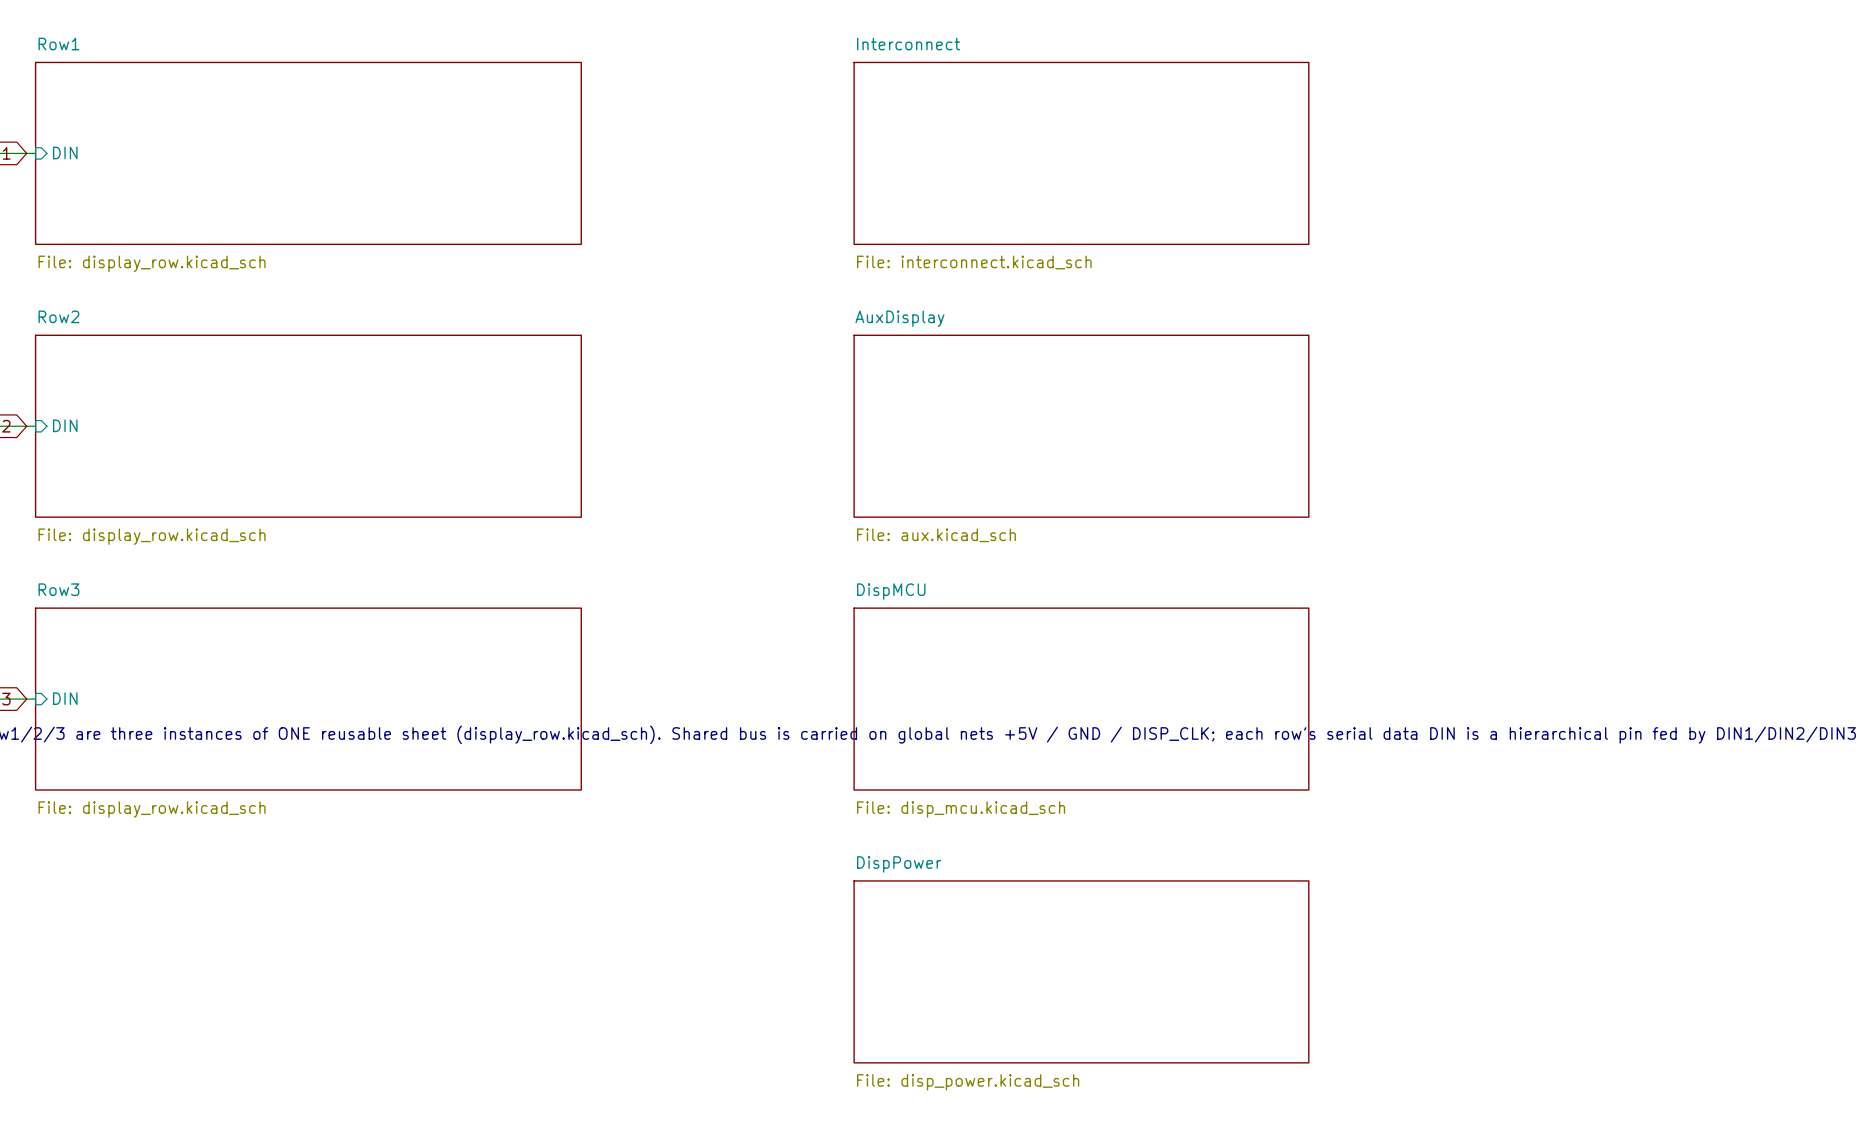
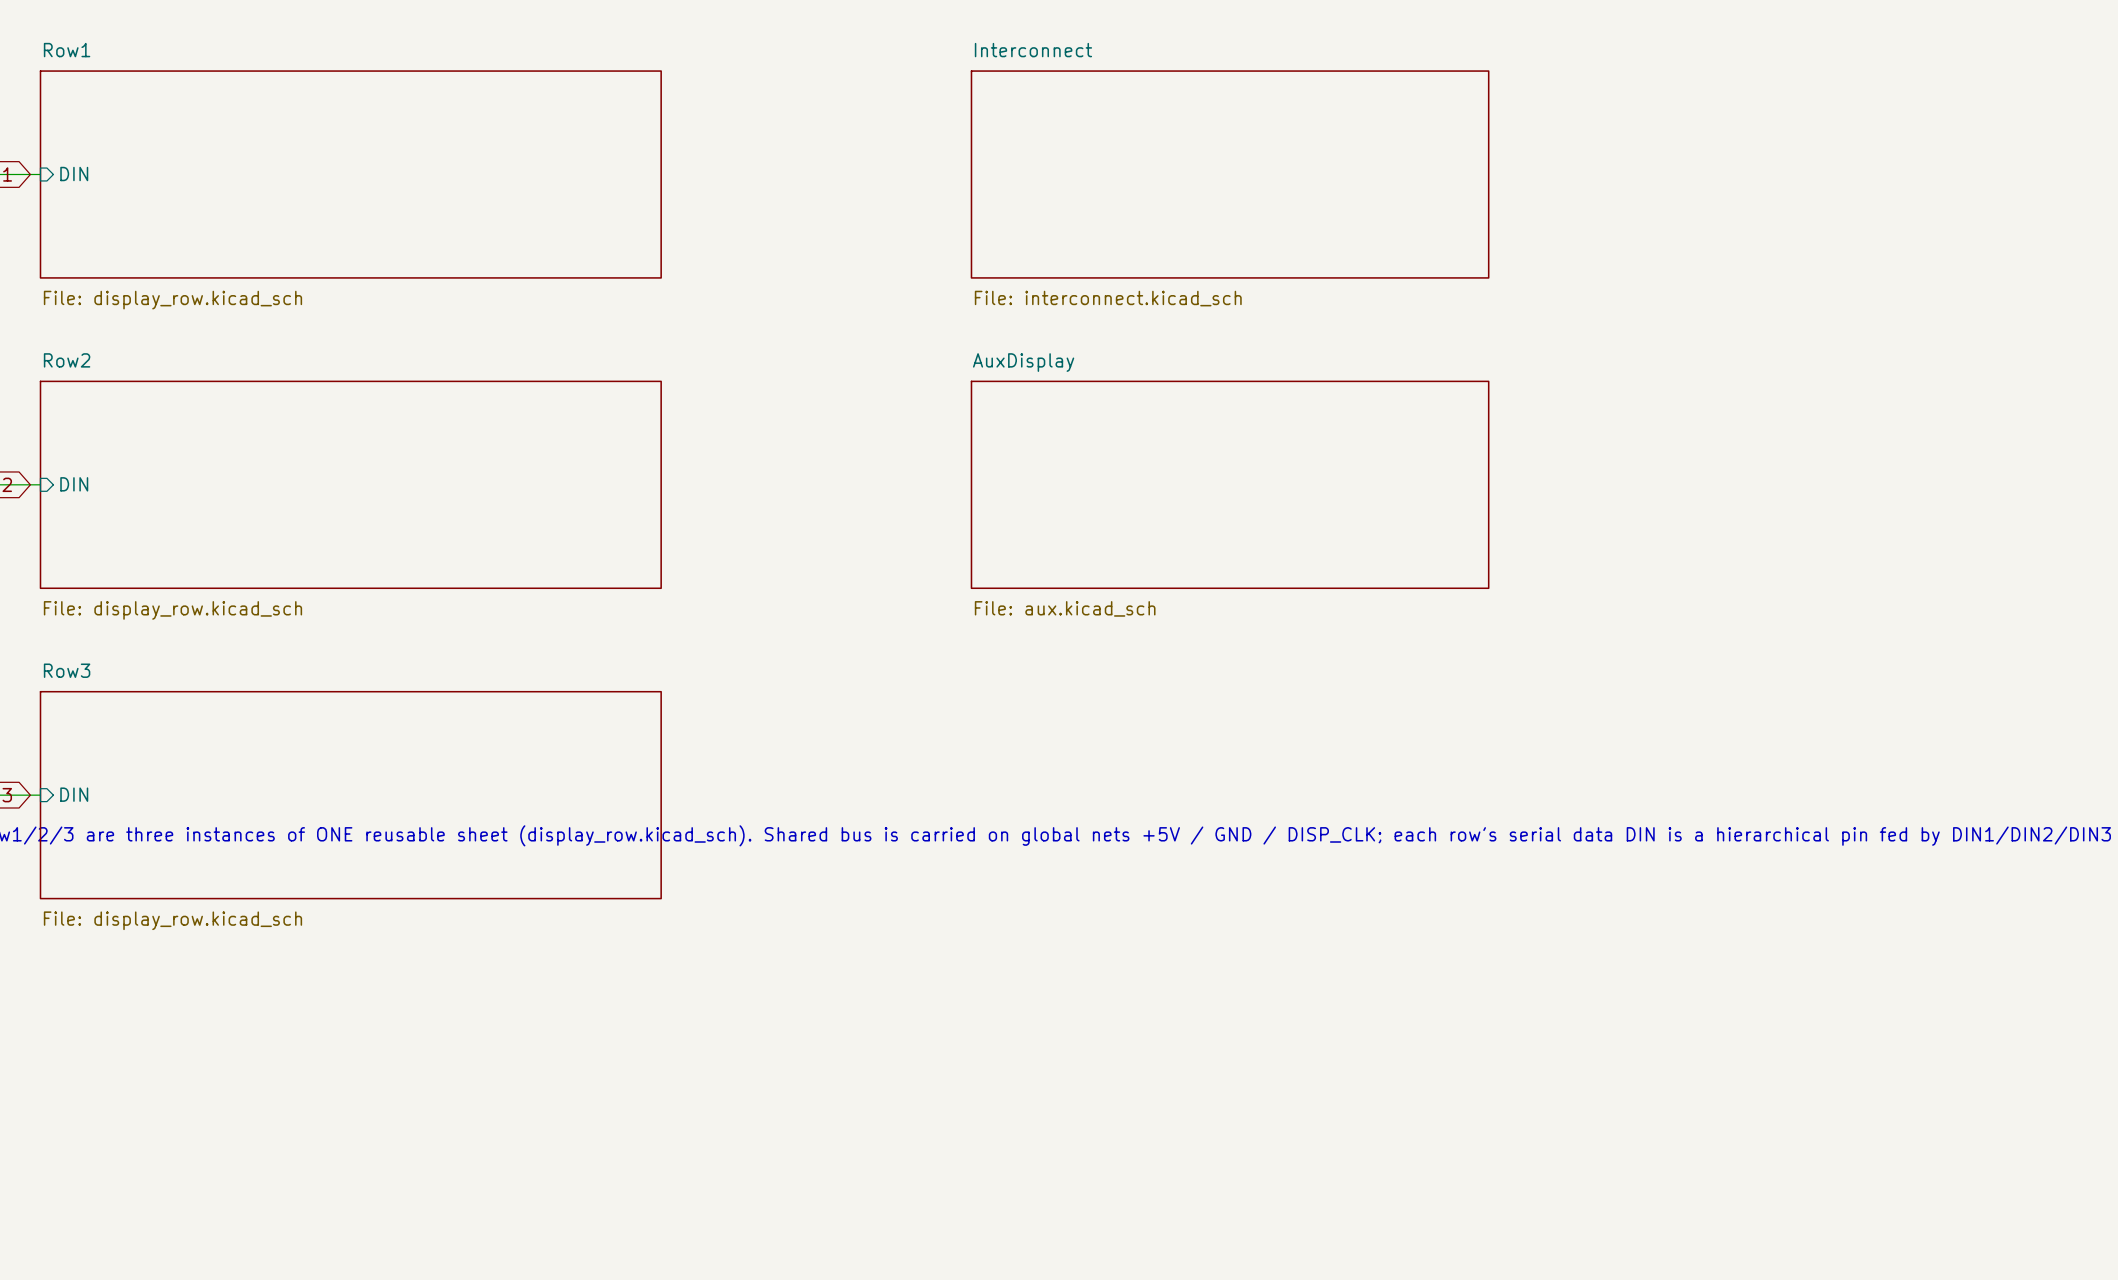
sheet DispMCU: File: disp_mcu.kicad_sch (1081, 699) -> none
sheet DispPower: File: disp_power.kicad_sch (1081, 971) -> none

